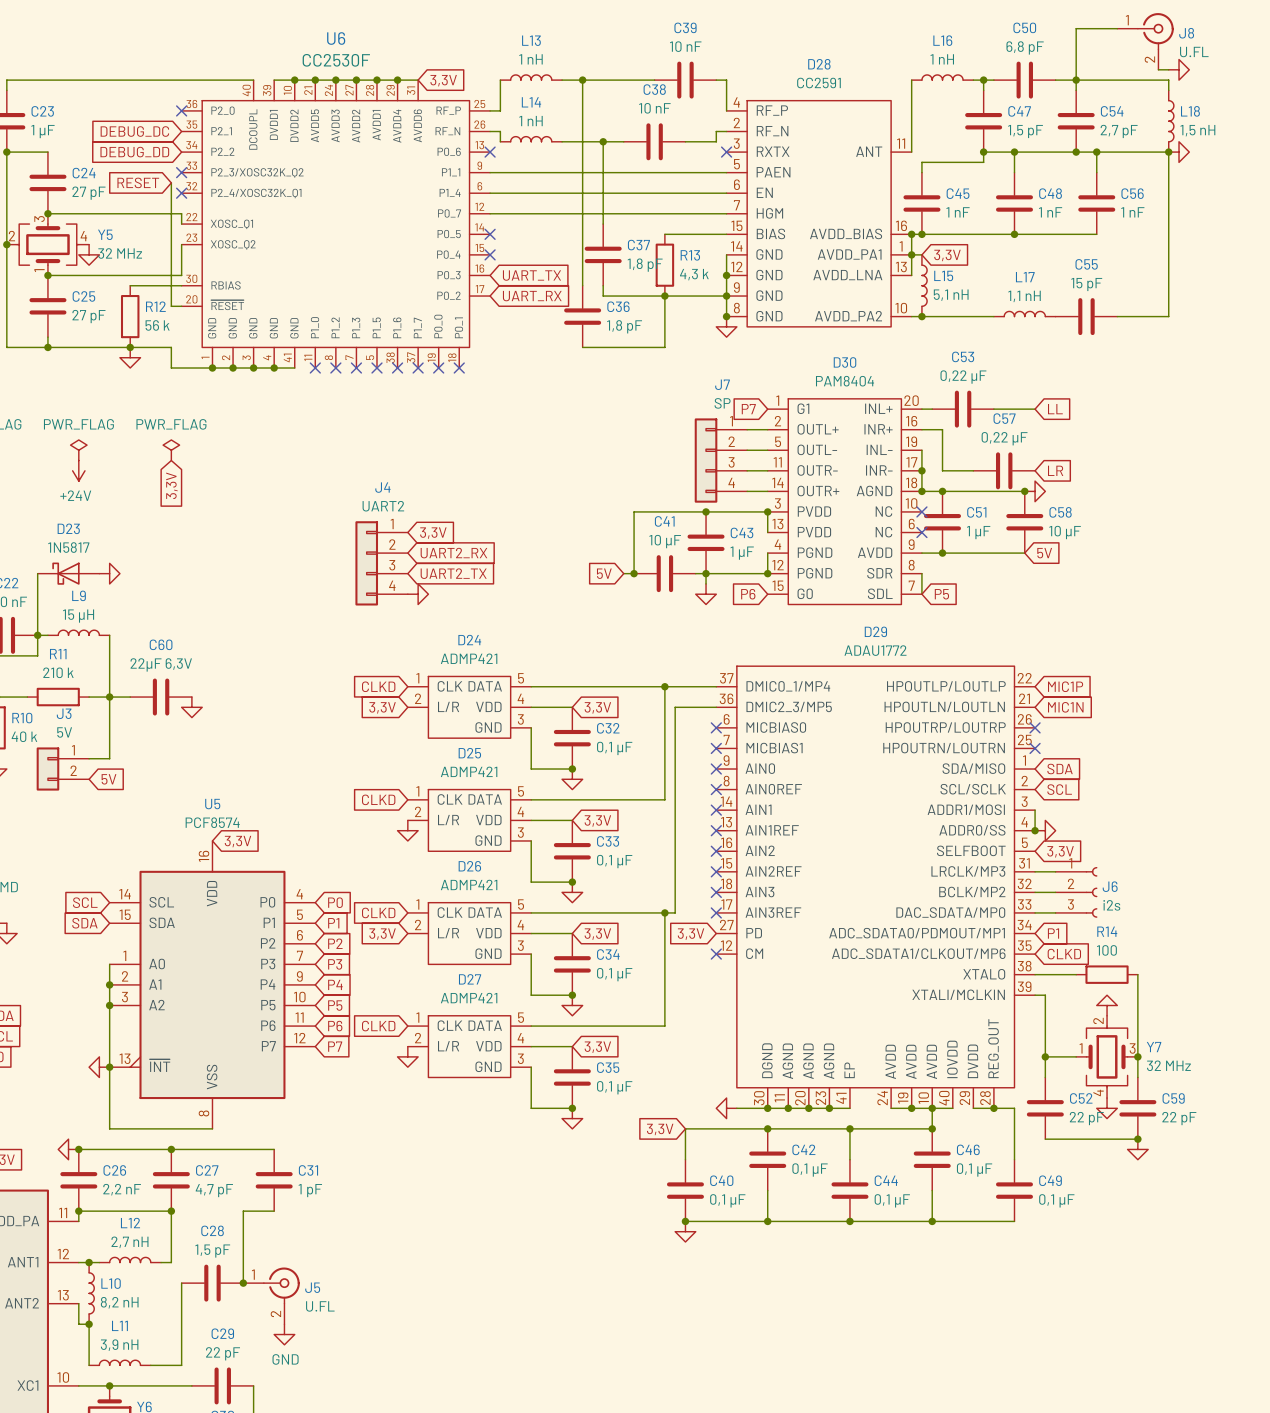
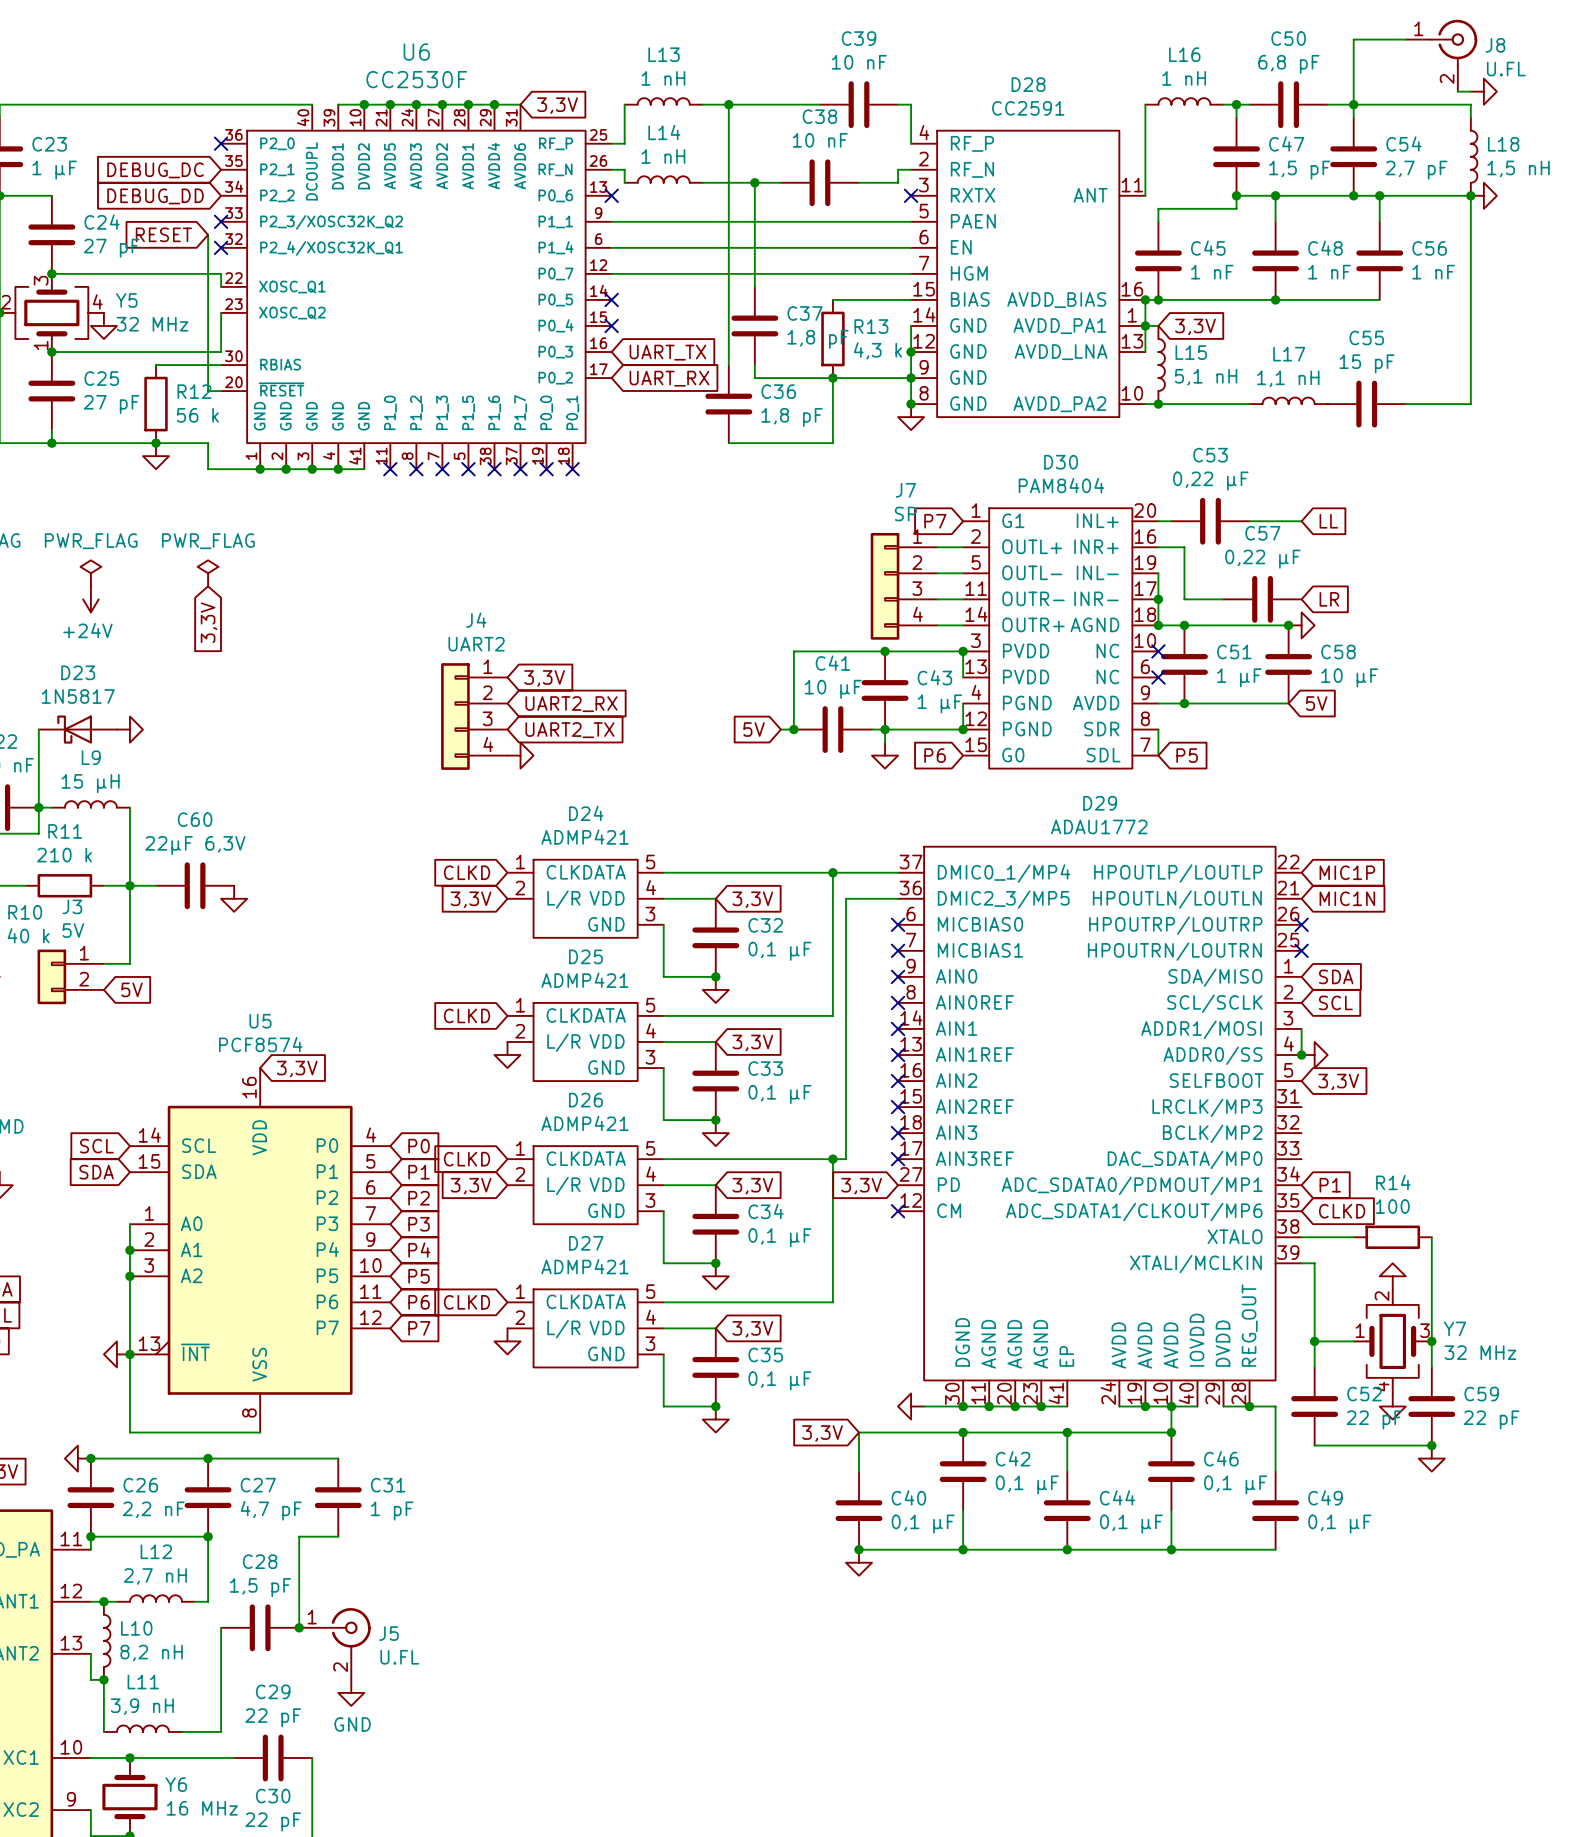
wire: (1035, 871) (1055, 871) -> none
wire: (1035, 892) (1055, 892) -> none
J6: i2s (1076, 892) -> none
wire: (1035, 912) (1055, 912) -> none

